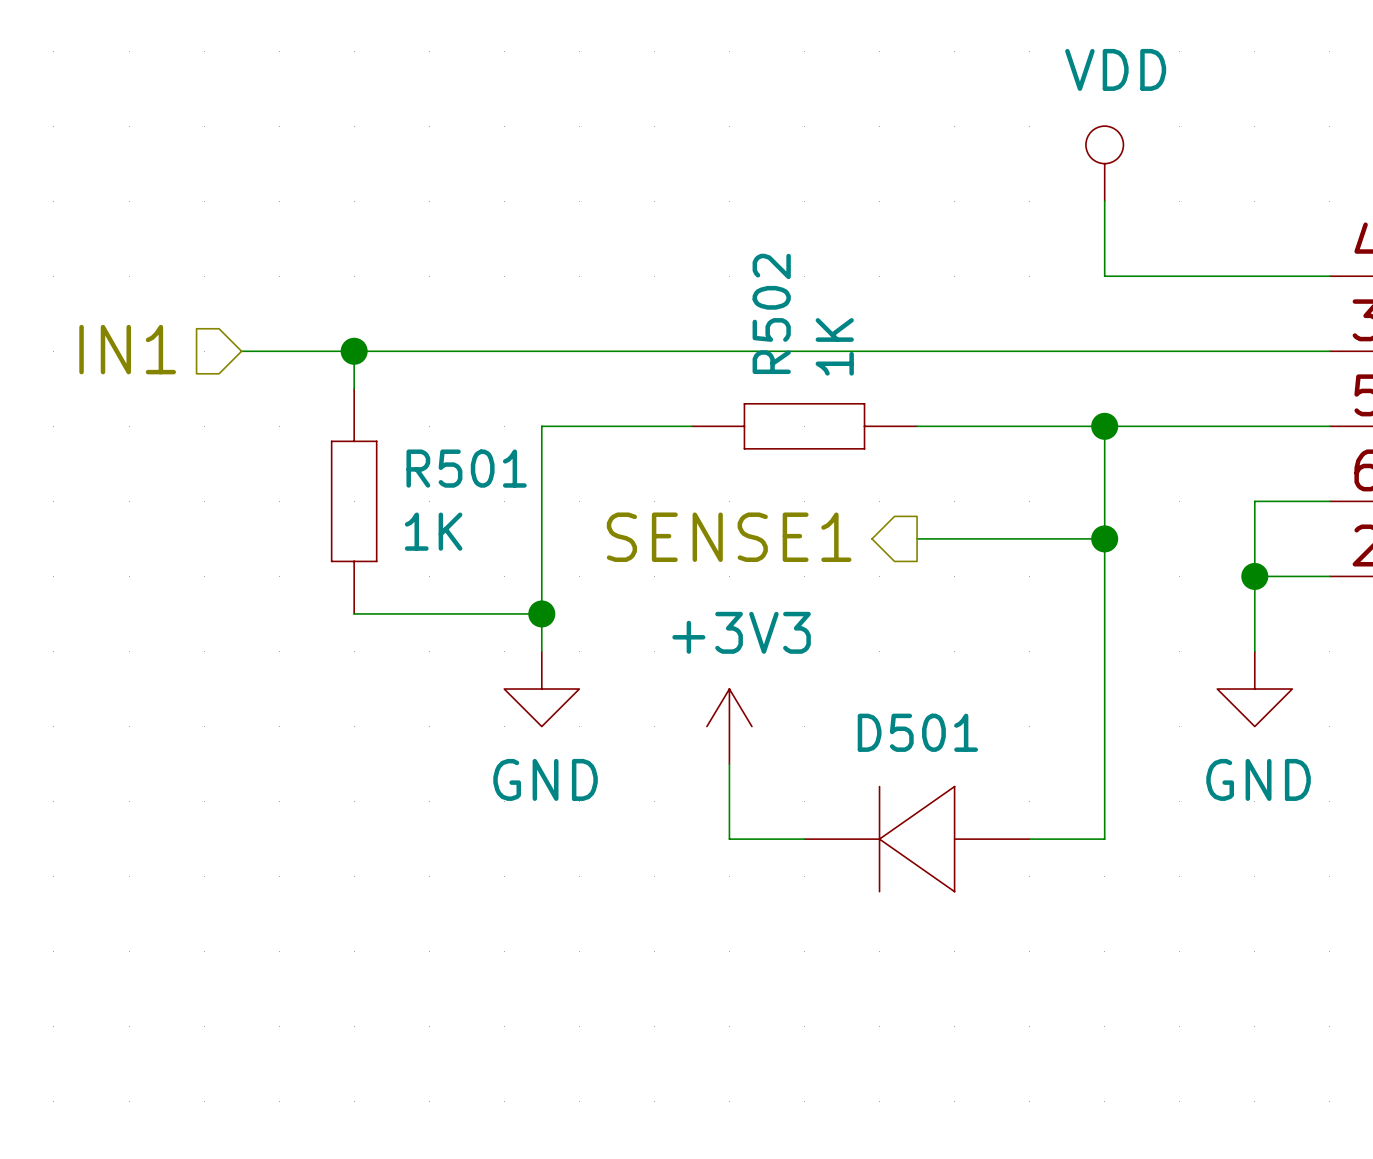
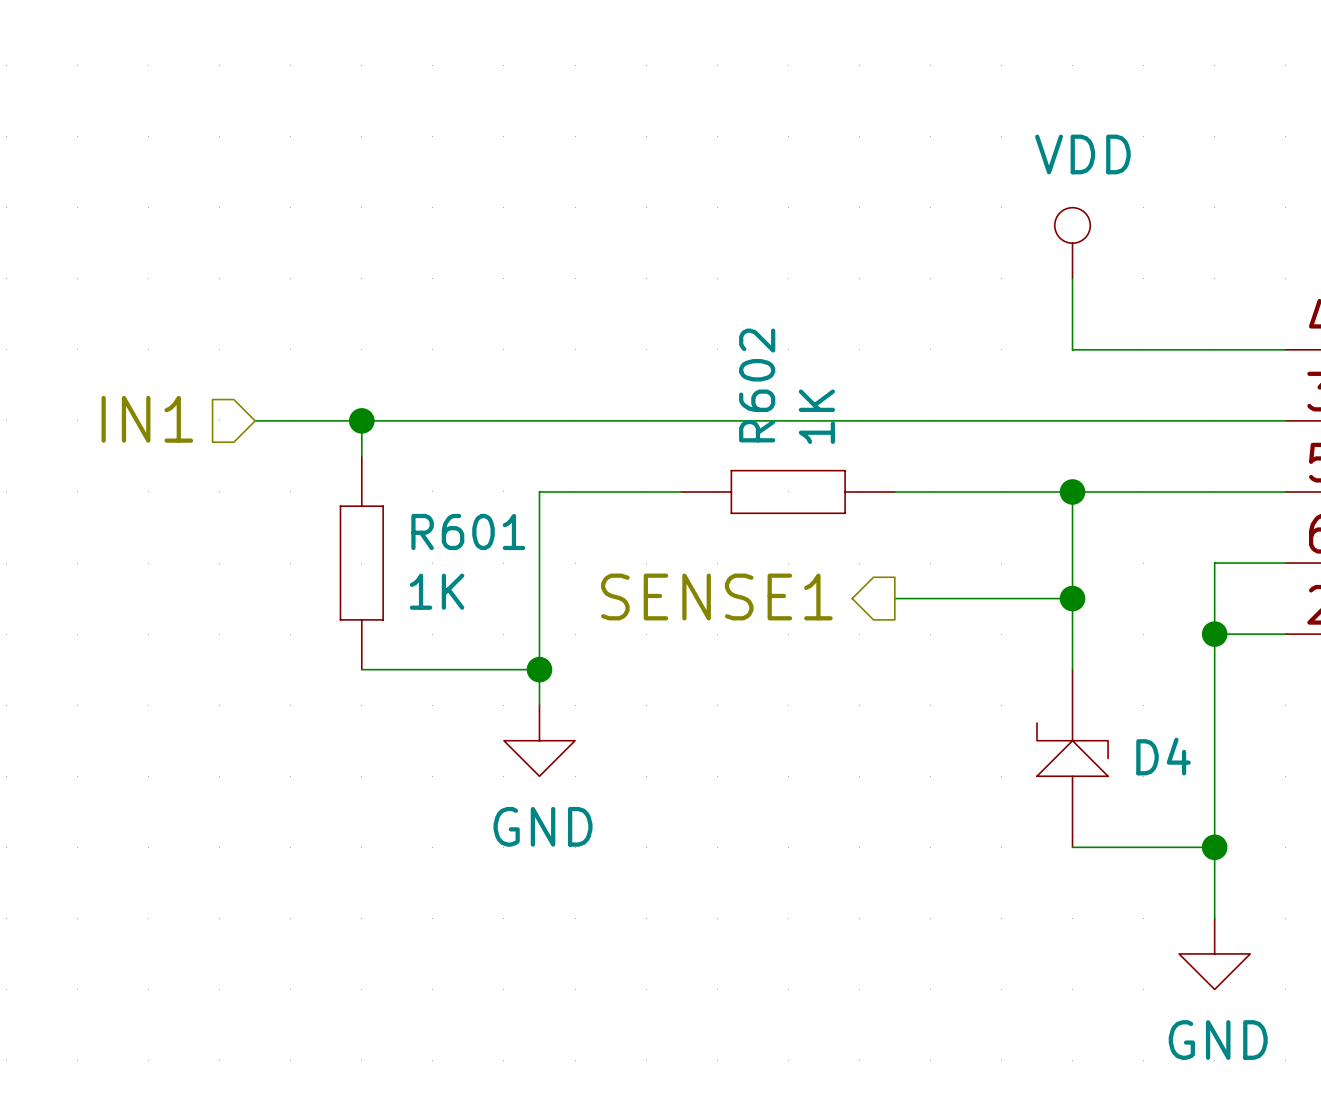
R502 name: R502 (771, 313) -> R602 (757, 385)
R501 name: R501 (466, 468) -> R601 (468, 531)
wire: (1104, 613) (1104, 839) (1029, 839) -> none
wire: none -> (1214, 705) (1214, 918)
power symbol position: GND (1254, 689) -> GND (1214, 953)
D4: none -> (1072, 758)
power symbol: +3V3 (729, 726) -> none
wire: (729, 764) (729, 839) (804, 839) -> none
wire: none -> (1072, 847) (1214, 847)
junction: none -> (1214, 847)
D501: (917, 839) -> none

